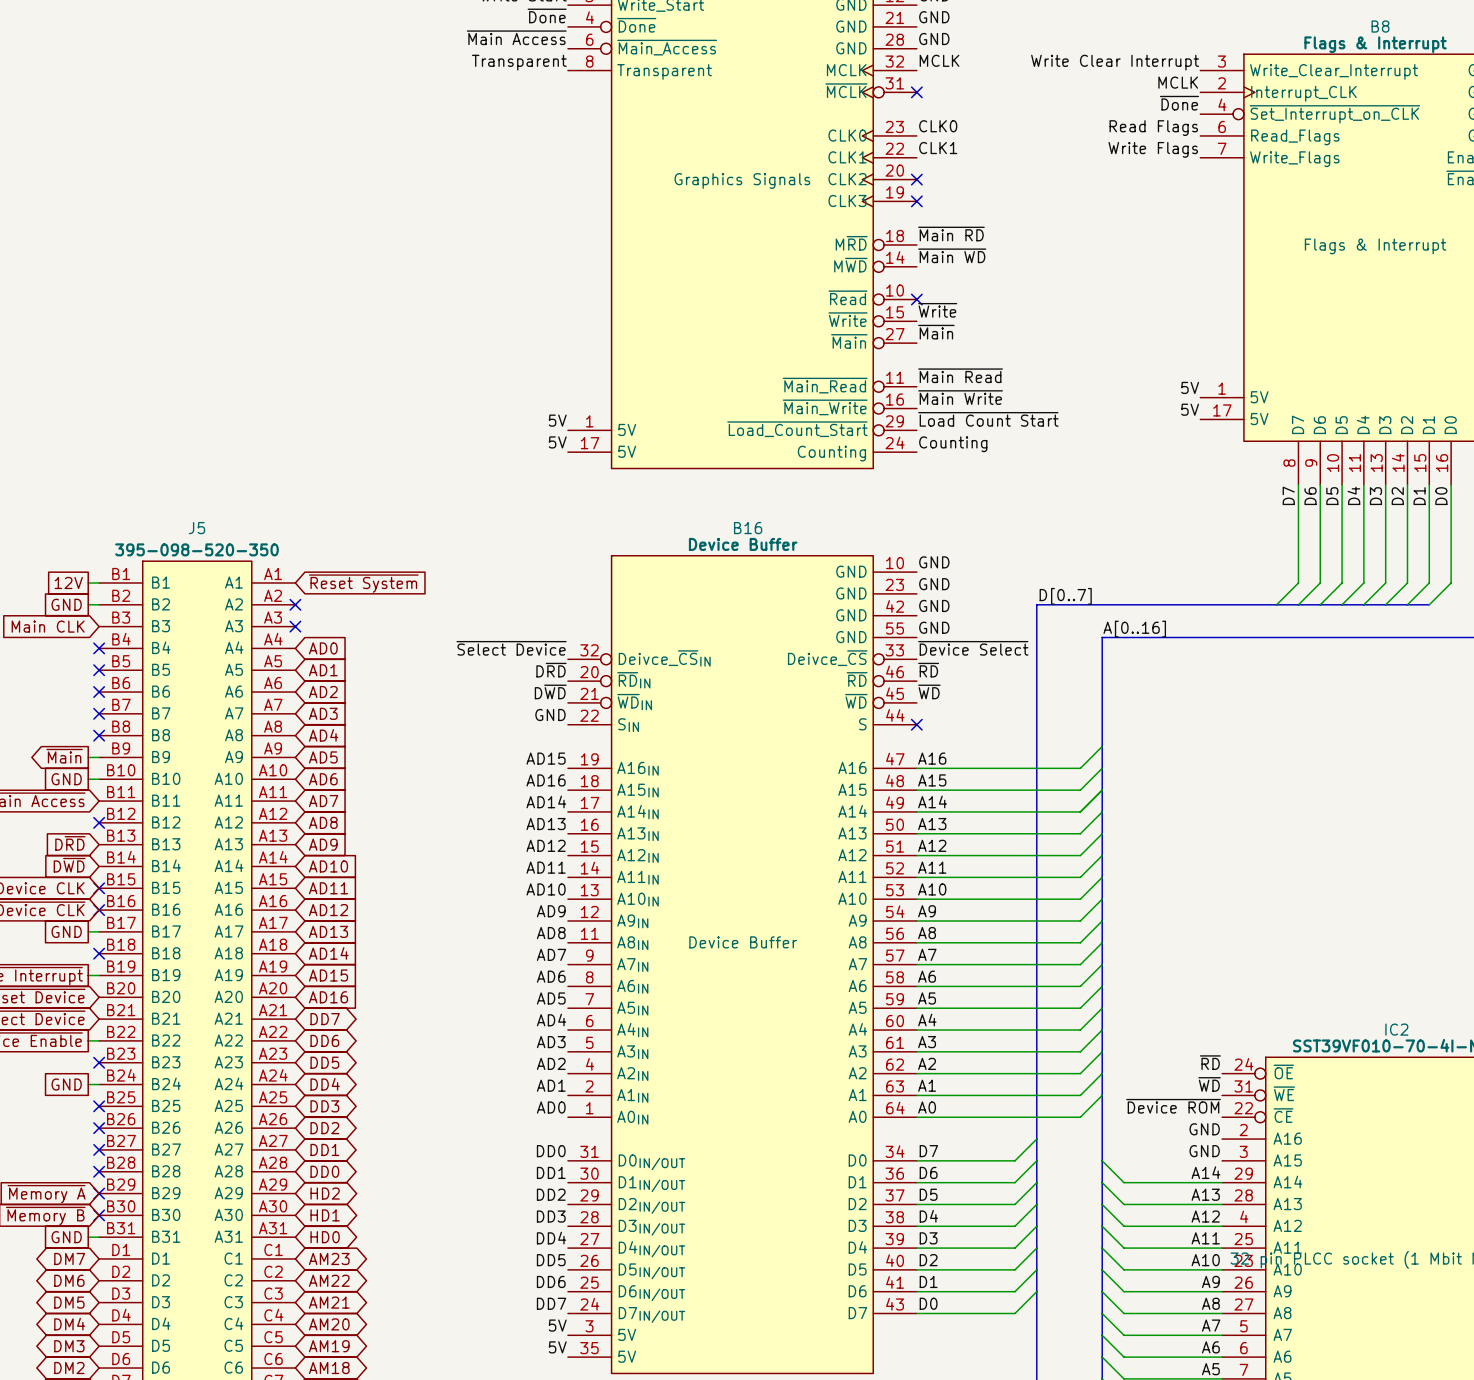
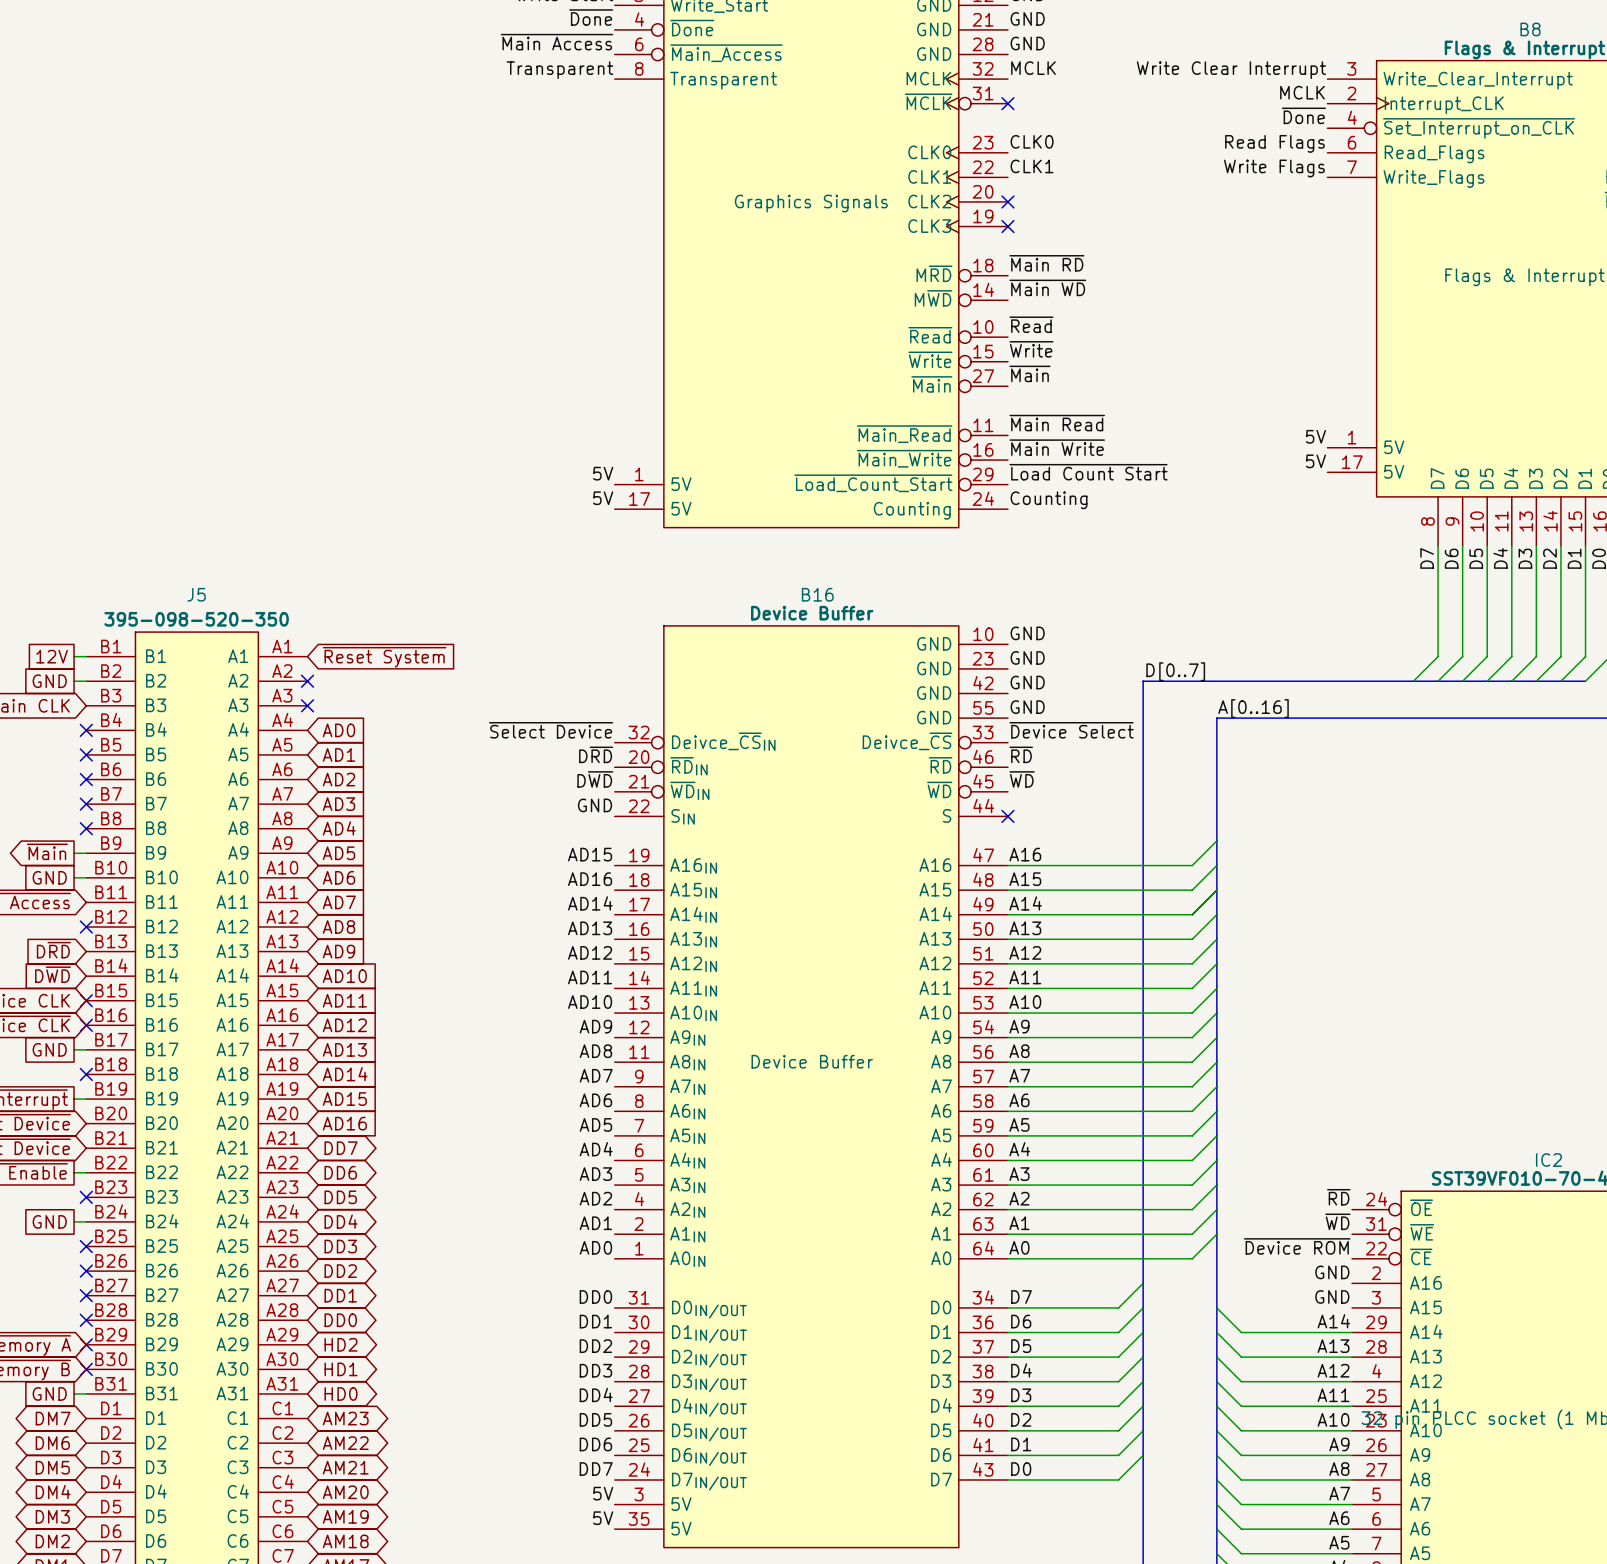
label: none -> ~{Read} (1031, 324)
no-connect mark: (916, 299) -> none

